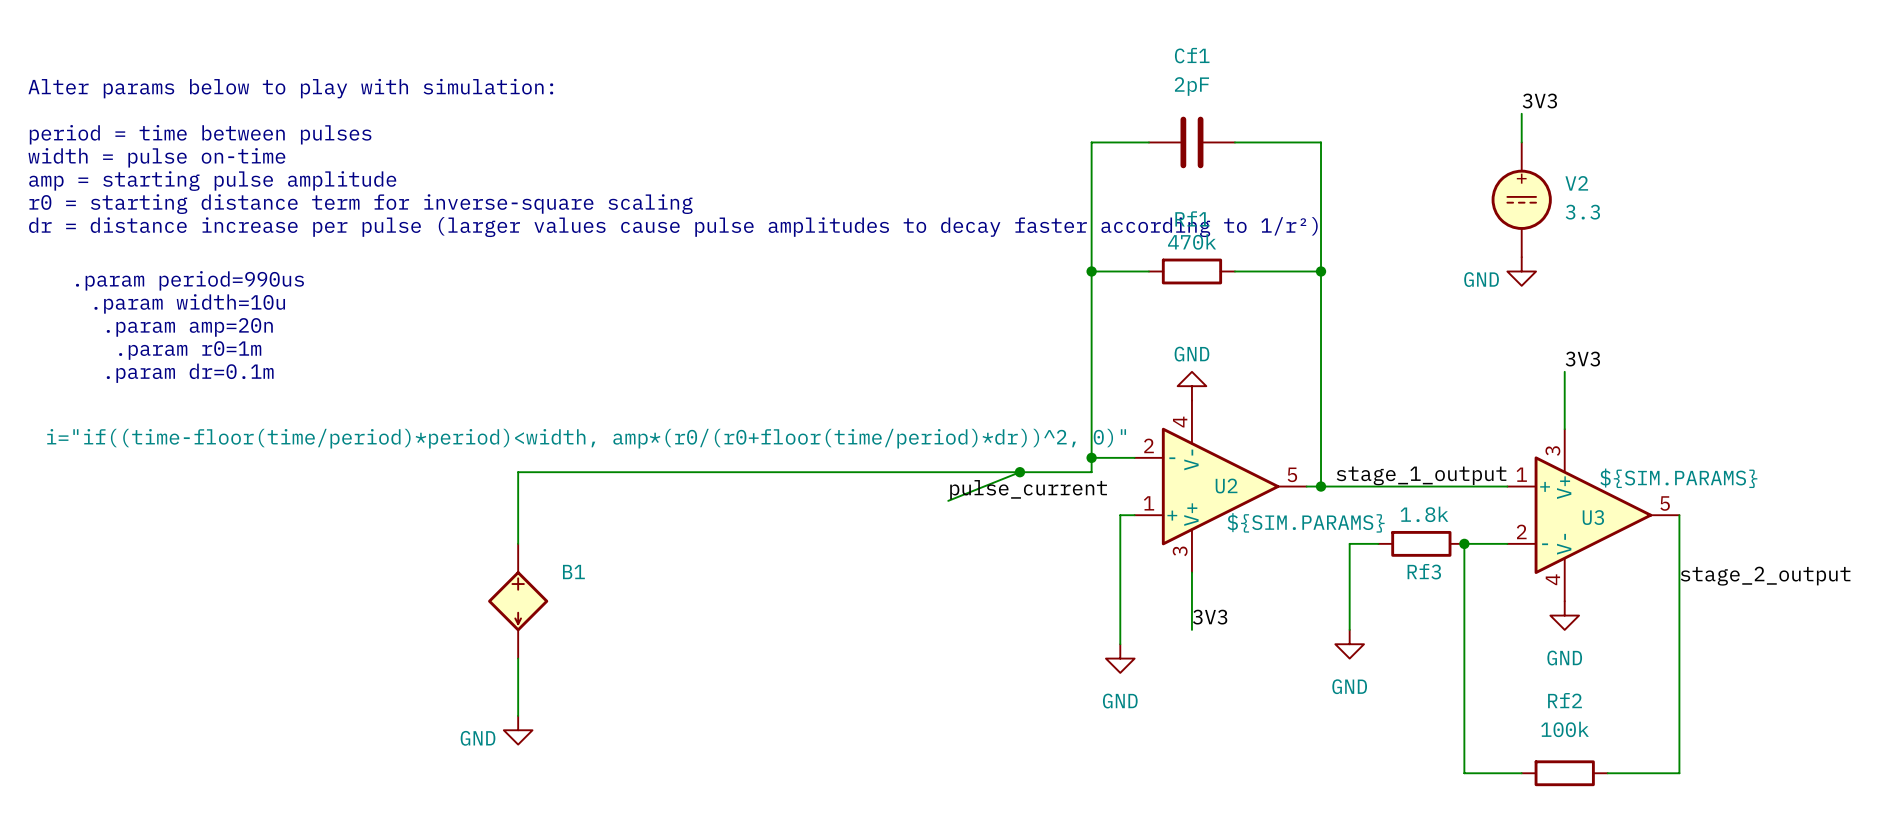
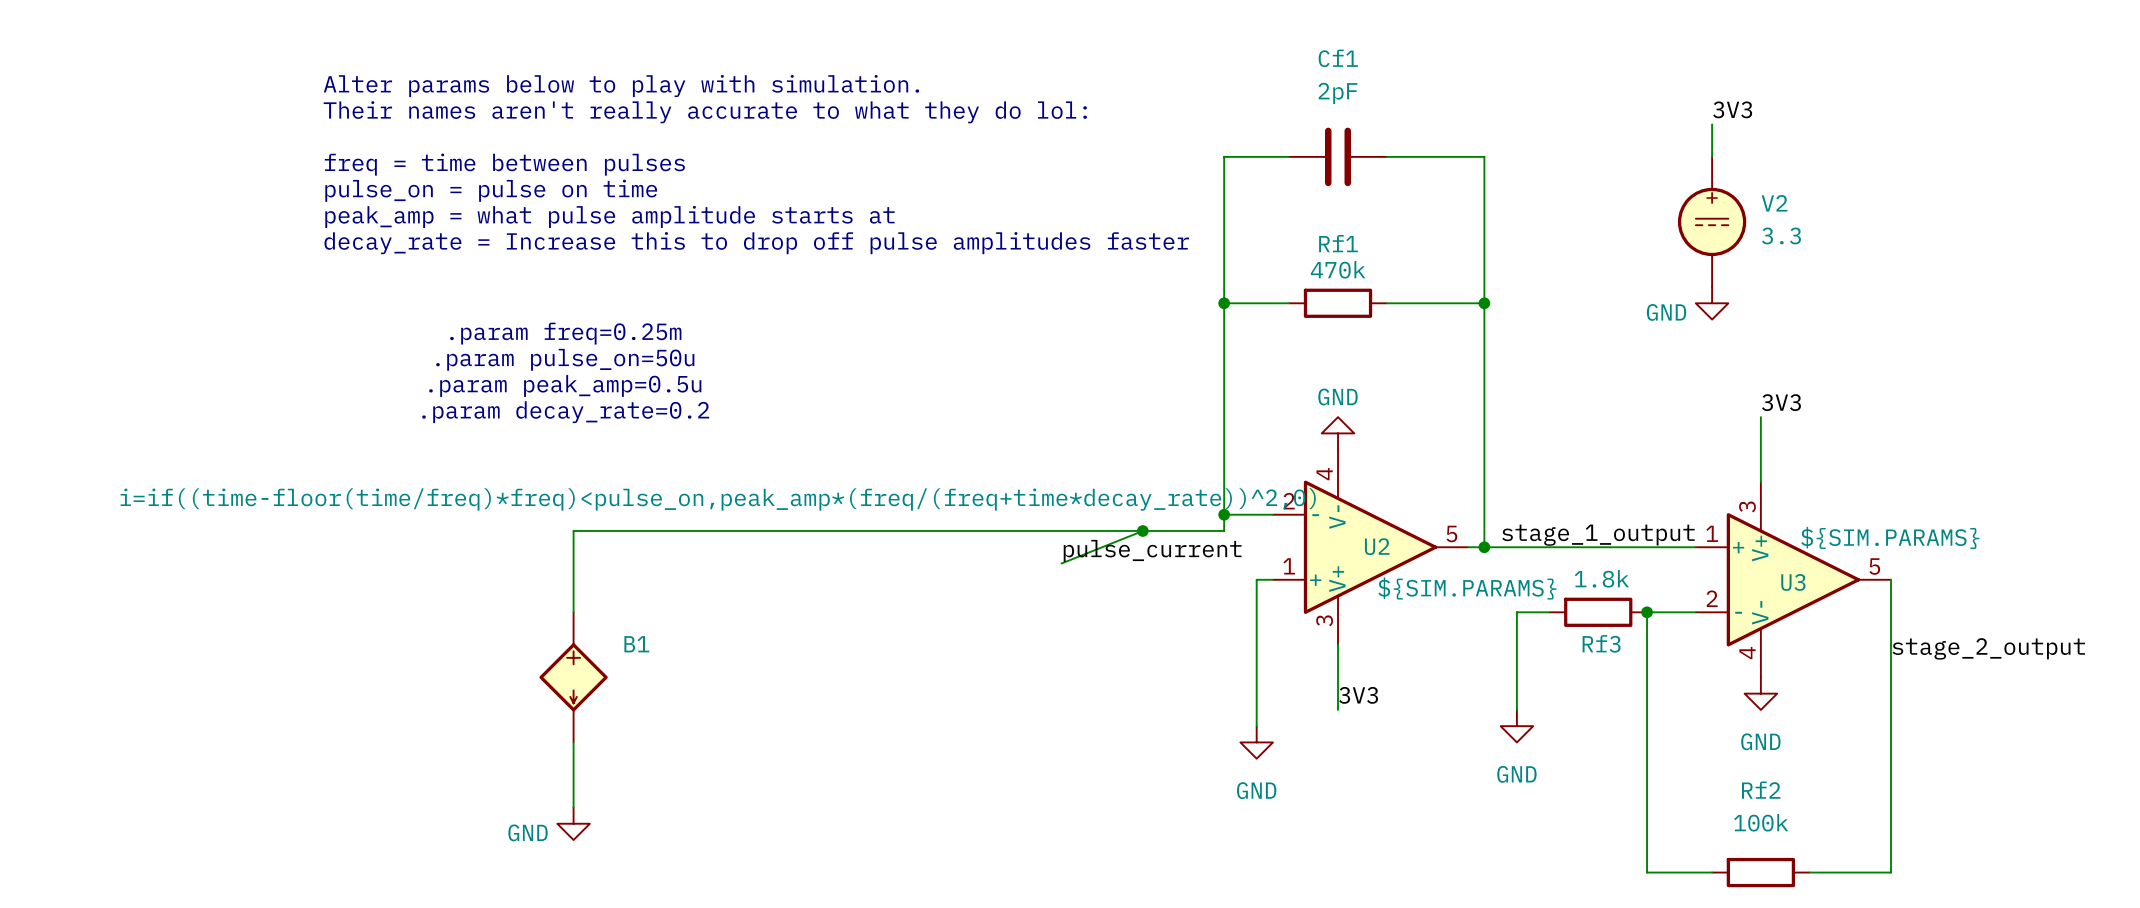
text: Alter params below to play with simulation: (290, 88) -> Alter params below to play with simulation. (621, 86)
text: none -> Their names aren't really accurate to what they do lol: (705, 112)
text: period = time between pulses (200, 134) -> freq = time between pulses (504, 164)
text: width = pulse on-time (156, 157) -> pulse_on = pulse on time (491, 190)
text: amp = starting pulse amplitude (212, 181) -> peak_amp = what pulse amplitude starts at (609, 216)
text: r0 = starting distance term for inverse-square scaling (361, 204) -> none
text: none -> decay_rate = Increase this to drop off pulse amplitudes faster (756, 243)
text: dr = distance increase per pulse (larger values cause pulse amplitudes to decay faster according to 1/r²) (673, 227) -> none
text: .param period=990us (189, 280) -> none
text: none -> .param freq=0.25m (565, 333)
text: .param width=10u (189, 303) -> none
text: none -> .param pulse_on=50u (565, 359)
text: .param amp=20n (189, 327) -> none
text: none -> .param peak_amp=0.5u (565, 385)
text: .param r0=1m (190, 350) -> none
text: none -> .param decay_rate=0.2 (565, 412)
text: .param dr=0.1m (190, 373) -> none
B1 value: i="if((time-floor(time/period)*period)<width, amp*(r0/(r0+floor(time/period)*dr))^2, 0)" (586, 438) -> i=if((time-floor(time/freq)*freq)<pulse_on,peak_amp*(freq/(freq+time*decay_rate))^2,0) (718, 499)

